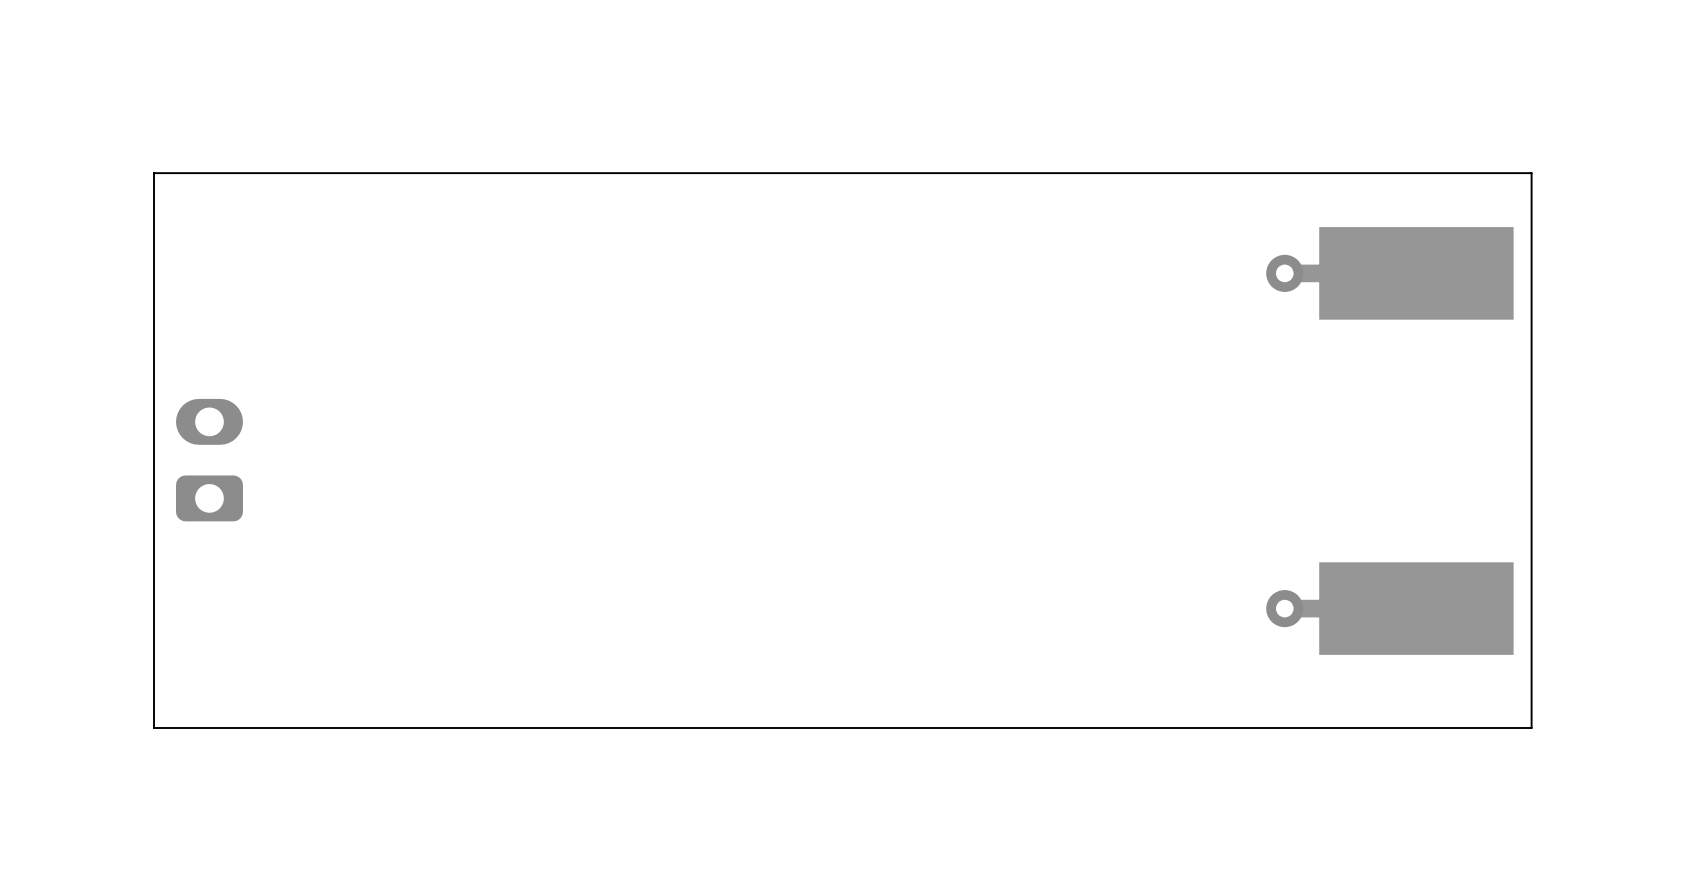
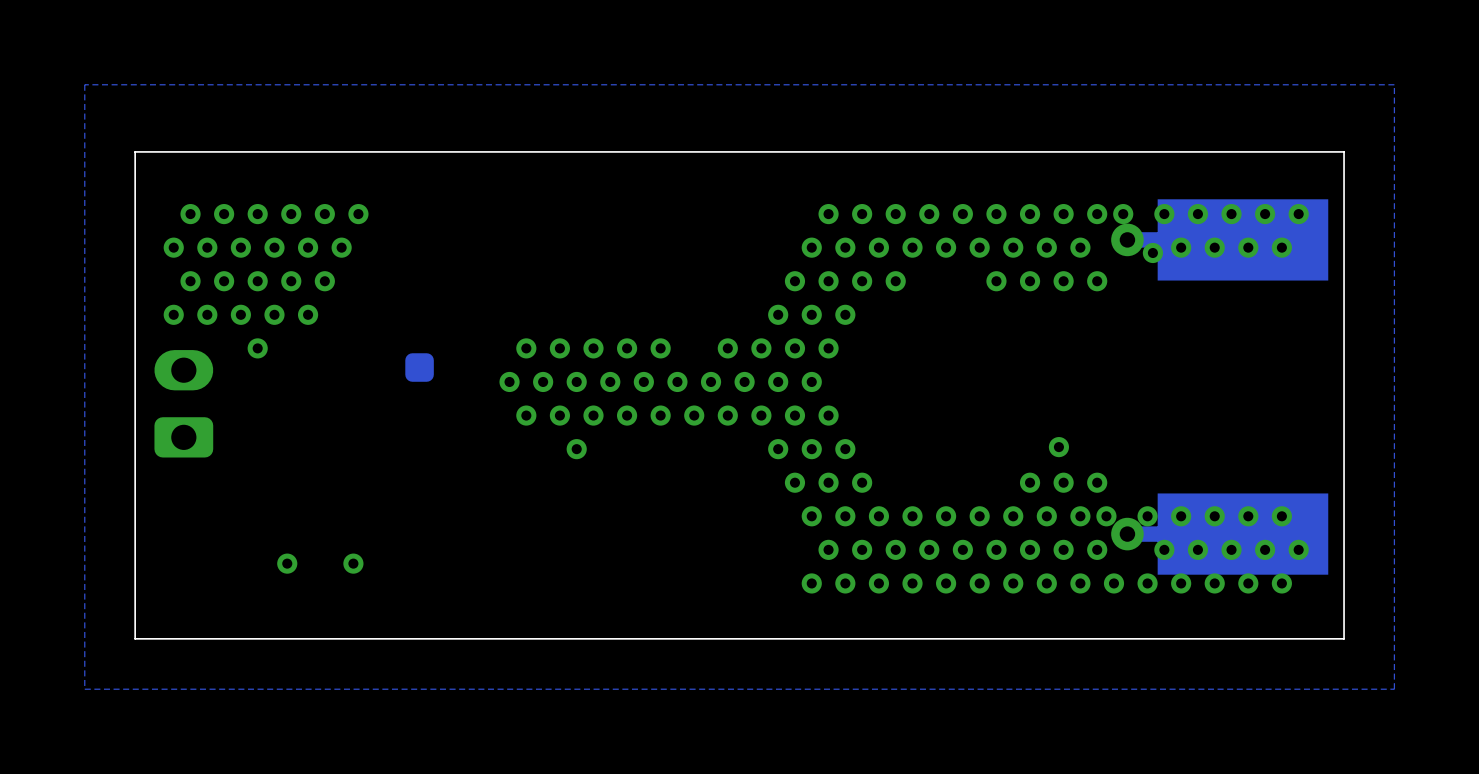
zone outline: none -> (1394, 84) (1394, 689) (84, 689) (84, 84) (1394, 84)
via: none -> (190, 214)
via: none -> (224, 214)
via: none -> (257, 214)
via: none -> (291, 214)
via: none -> (324, 214)
via: none -> (358, 214)
via: none -> (828, 214)
via: none -> (862, 214)
via: none -> (895, 214)
via: none -> (929, 214)
via: none -> (962, 214)
via: none -> (996, 214)
via: none -> (1030, 214)
via: none -> (1063, 214)
via: none -> (1097, 214)
via: none -> (1123, 214)
via: none -> (1164, 214)
via: none -> (1197, 214)
via: none -> (1231, 214)
via: none -> (1265, 214)
via: none -> (1298, 214)
via: none -> (173, 247)
via: none -> (207, 247)
via: none -> (240, 247)
via: none -> (274, 247)
via: none -> (308, 247)
via: none -> (341, 247)
via: none -> (811, 247)
via: none -> (845, 247)
via: none -> (878, 247)
via: none -> (912, 247)
via: none -> (946, 247)
via: none -> (979, 247)
via: none -> (1013, 247)
via: none -> (1046, 247)
via: none -> (1080, 247)
via: none -> (1181, 247)
via: none -> (1214, 247)
via: none -> (1248, 247)
via: none -> (1281, 247)
via: none -> (1152, 252)
via: none -> (190, 281)
via: none -> (224, 281)
via: none -> (257, 281)
via: none -> (291, 281)
via: none -> (324, 281)
via: none -> (794, 281)
via: none -> (828, 281)
via: none -> (862, 281)
via: none -> (895, 281)
via: none -> (996, 281)
via: none -> (1030, 281)
via: none -> (1063, 281)
via: none -> (1097, 281)
via: none -> (173, 314)
via: none -> (207, 314)
via: none -> (240, 314)
via: none -> (274, 314)
via: none -> (308, 314)
via: none -> (778, 314)
via: none -> (811, 314)
via: none -> (845, 314)
via: none -> (257, 348)
via: none -> (526, 348)
via: none -> (559, 348)
via: none -> (593, 348)
via: none -> (627, 348)
via: none -> (660, 348)
via: none -> (727, 348)
via: none -> (761, 348)
via: none -> (794, 348)
via: none -> (828, 348)
part: none -> (419, 367)
via: none -> (509, 381)
via: none -> (543, 381)
via: none -> (576, 381)
via: none -> (610, 381)
via: none -> (643, 381)
via: none -> (677, 381)
via: none -> (711, 381)
via: none -> (744, 381)
via: none -> (778, 381)
via: none -> (811, 381)
via: none -> (526, 415)
via: none -> (559, 415)
via: none -> (593, 415)
via: none -> (627, 415)
via: none -> (660, 415)
via: none -> (694, 415)
via: none -> (727, 415)
via: none -> (761, 415)
via: none -> (794, 415)
via: none -> (828, 415)
via: none -> (1058, 447)
via: none -> (576, 449)
via: none -> (778, 449)
via: none -> (811, 449)
via: none -> (845, 449)
via: none -> (794, 482)
via: none -> (828, 482)
via: none -> (862, 482)
via: none -> (1030, 482)
via: none -> (1063, 482)
via: none -> (1097, 482)
via: none -> (811, 516)
via: none -> (845, 516)
via: none -> (878, 516)
via: none -> (912, 516)
via: none -> (946, 516)
via: none -> (979, 516)
via: none -> (1013, 516)
via: none -> (1046, 516)
via: none -> (1080, 516)
via: none -> (1106, 516)
via: none -> (1147, 516)
via: none -> (1181, 516)
via: none -> (1214, 516)
via: none -> (1248, 516)
via: none -> (1281, 516)
via: none -> (828, 549)
via: none -> (862, 549)
via: none -> (895, 549)
via: none -> (929, 549)
via: none -> (962, 549)
via: none -> (996, 549)
via: none -> (1030, 549)
via: none -> (1063, 549)
via: none -> (1097, 549)
via: none -> (1164, 549)
via: none -> (1197, 549)
via: none -> (1231, 549)
via: none -> (1265, 549)
via: none -> (1298, 549)
via: none -> (287, 563)
via: none -> (353, 563)
via: none -> (811, 583)
via: none -> (845, 583)
via: none -> (878, 583)
via: none -> (912, 583)
via: none -> (946, 583)
via: none -> (979, 583)
via: none -> (1013, 583)
via: none -> (1046, 583)
via: none -> (1080, 583)
via: none -> (1113, 583)
via: none -> (1147, 583)
via: none -> (1181, 583)
via: none -> (1214, 583)
via: none -> (1248, 583)
via: none -> (1281, 583)

